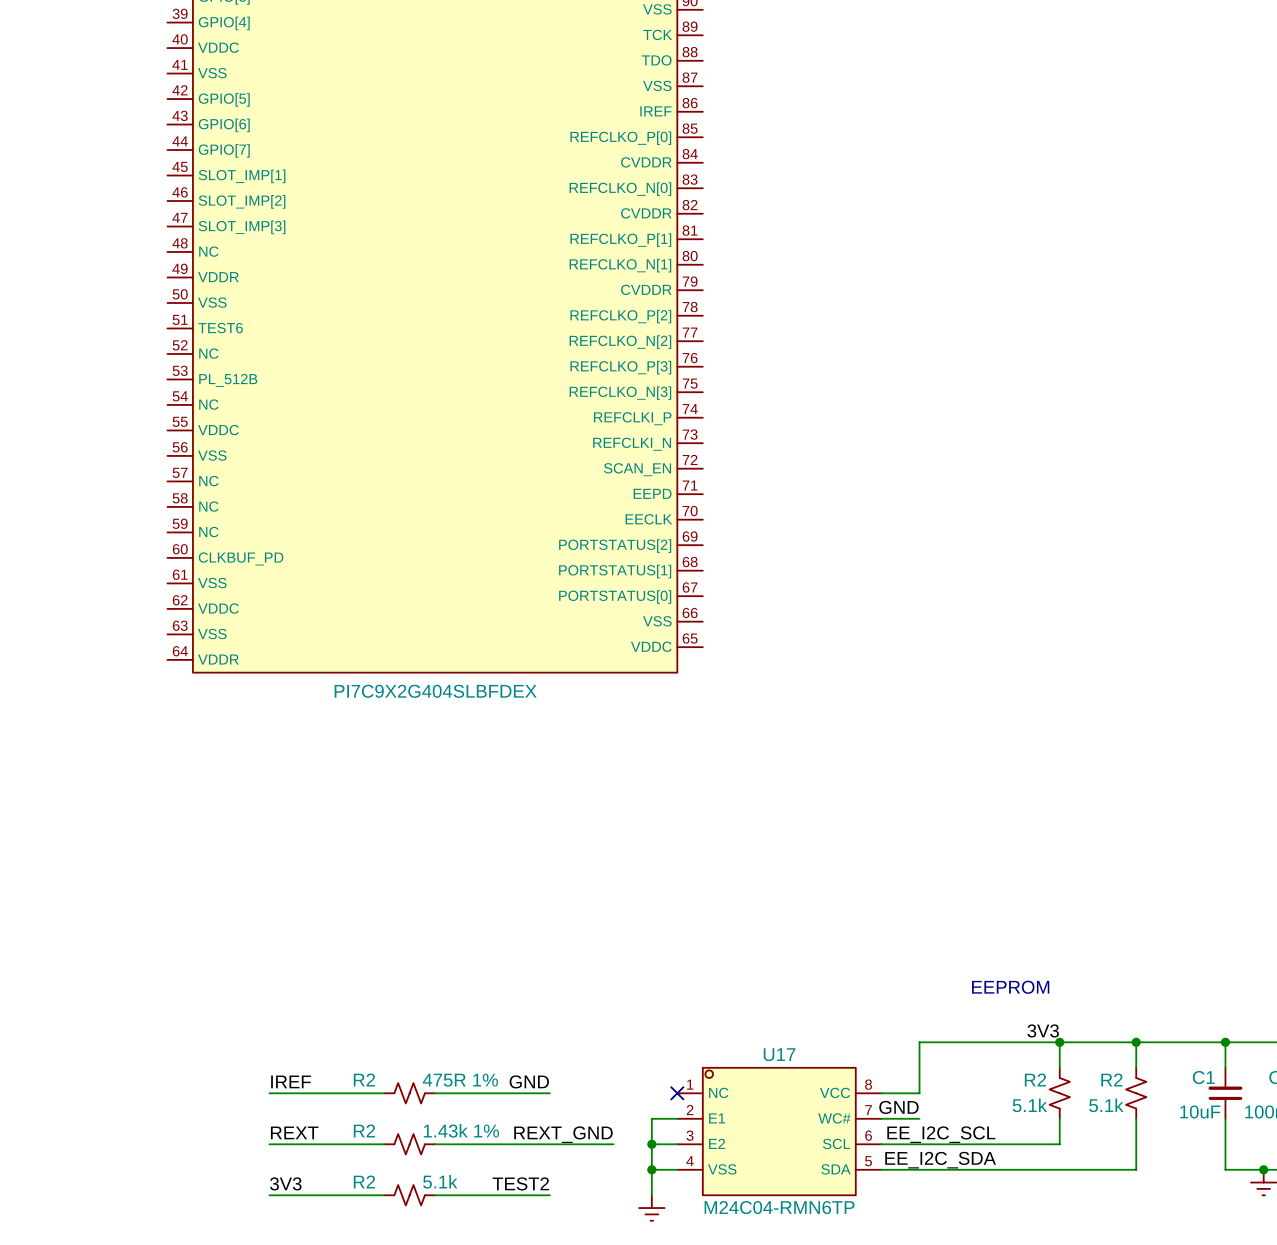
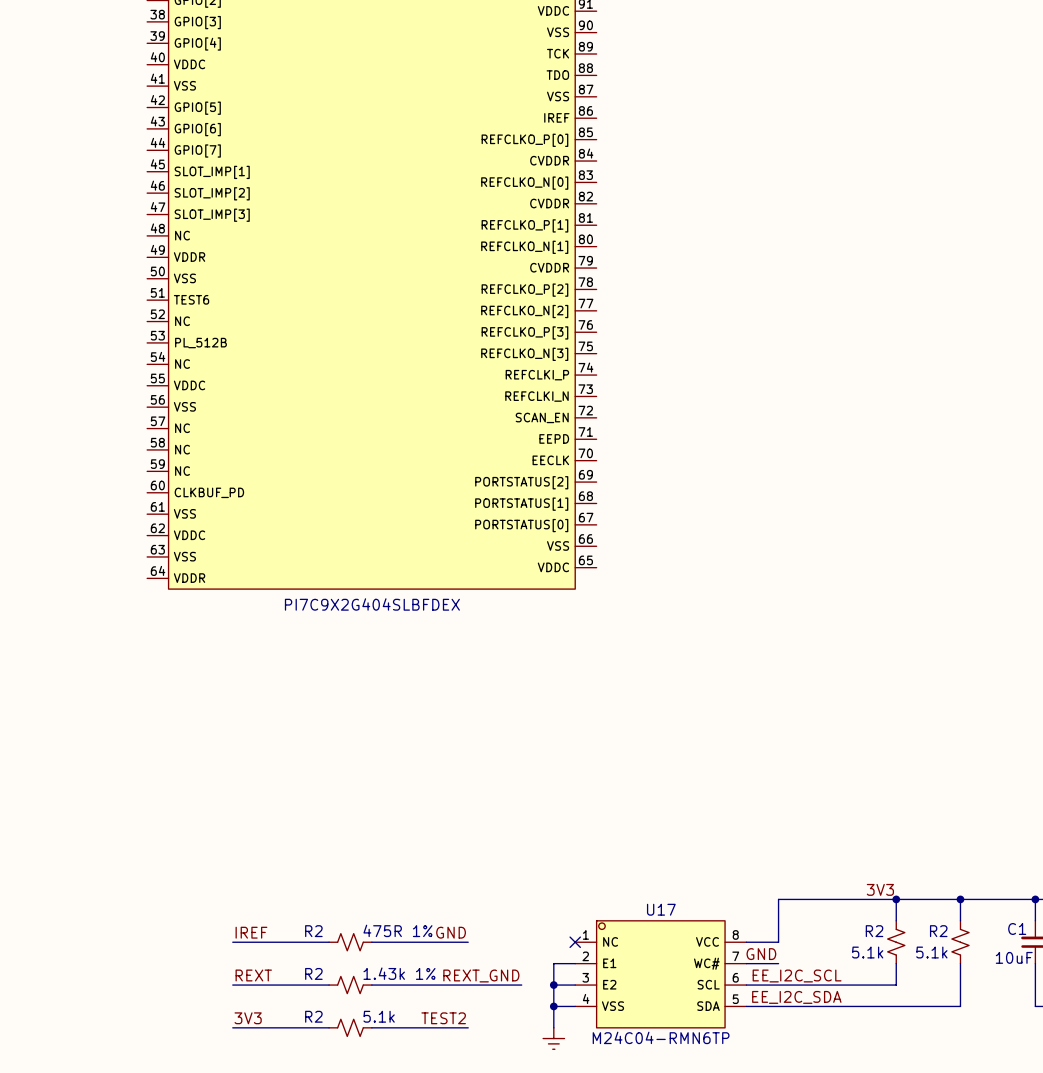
text: EEPROM (1010, 987) -> none

